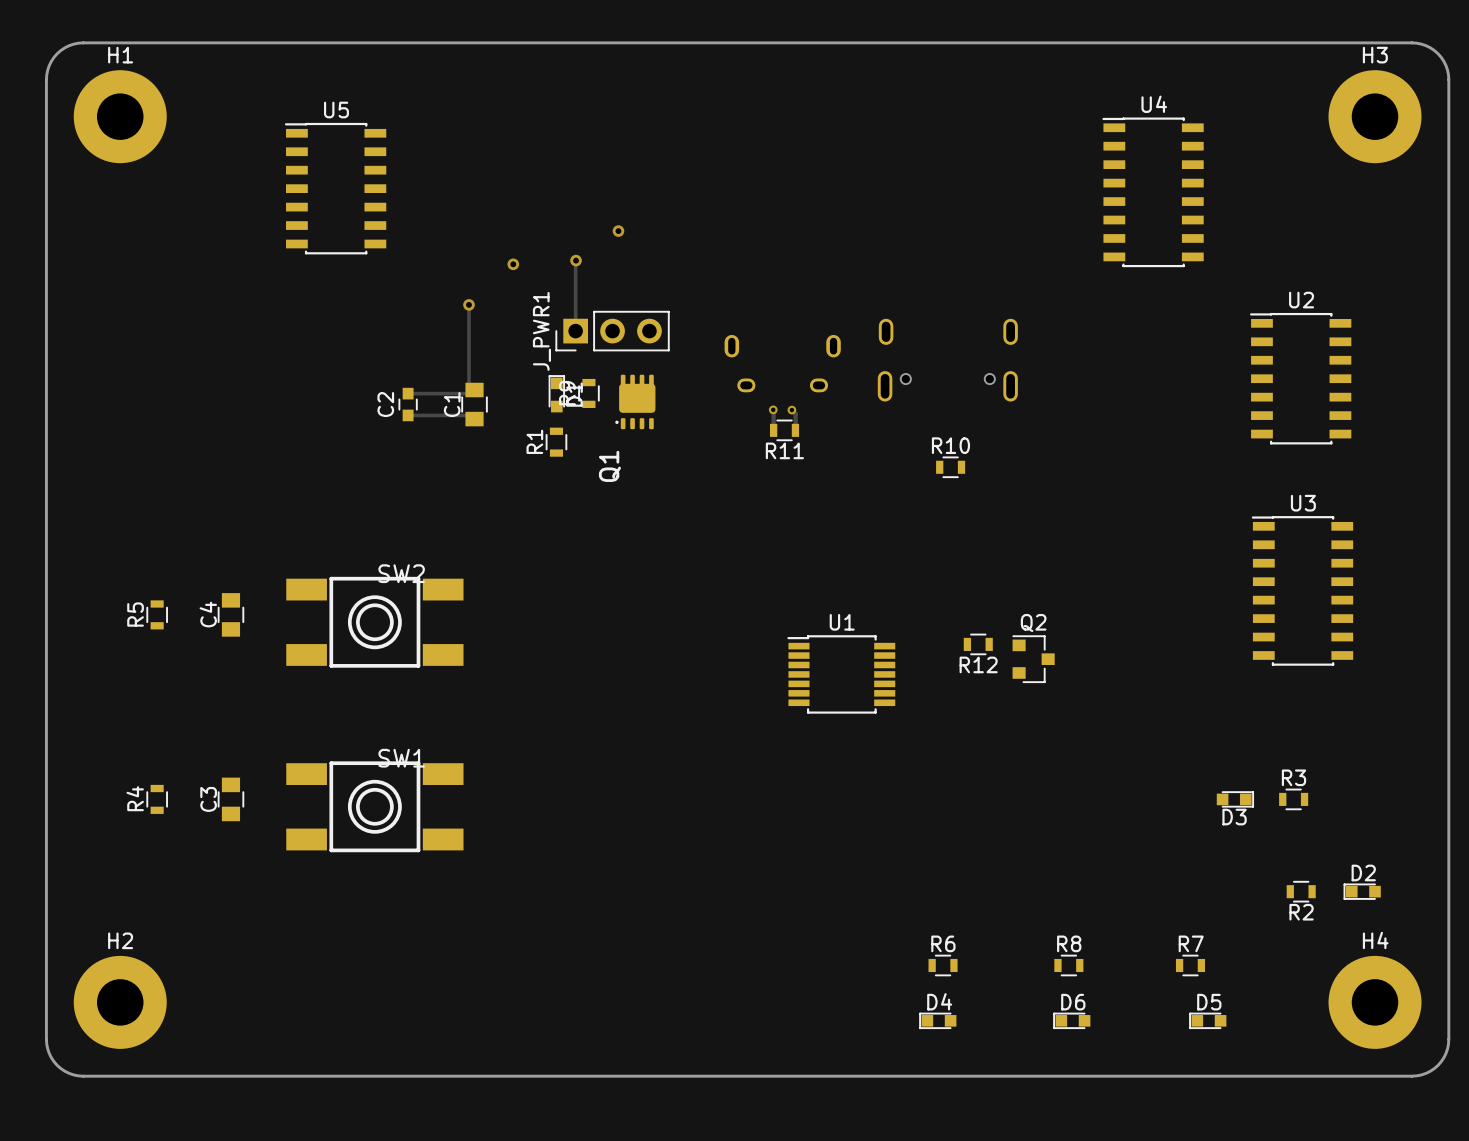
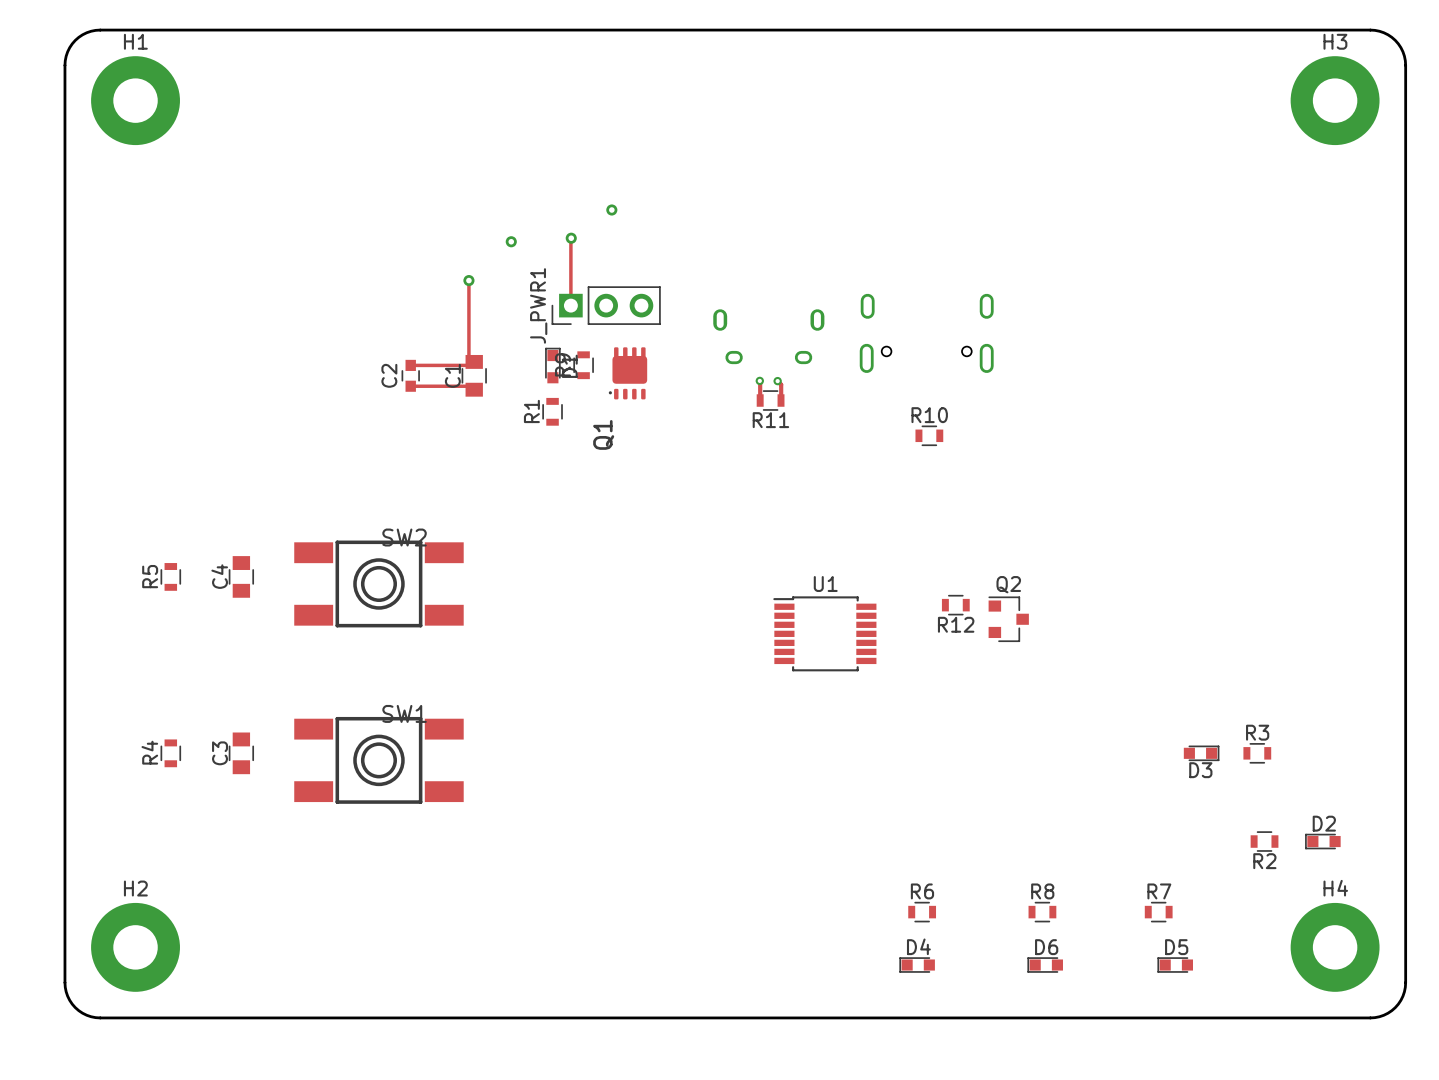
U5: (335, 188) -> none
U4: (1153, 192) -> none
U2: (1300, 378) -> none
U3: (1302, 590) -> none

